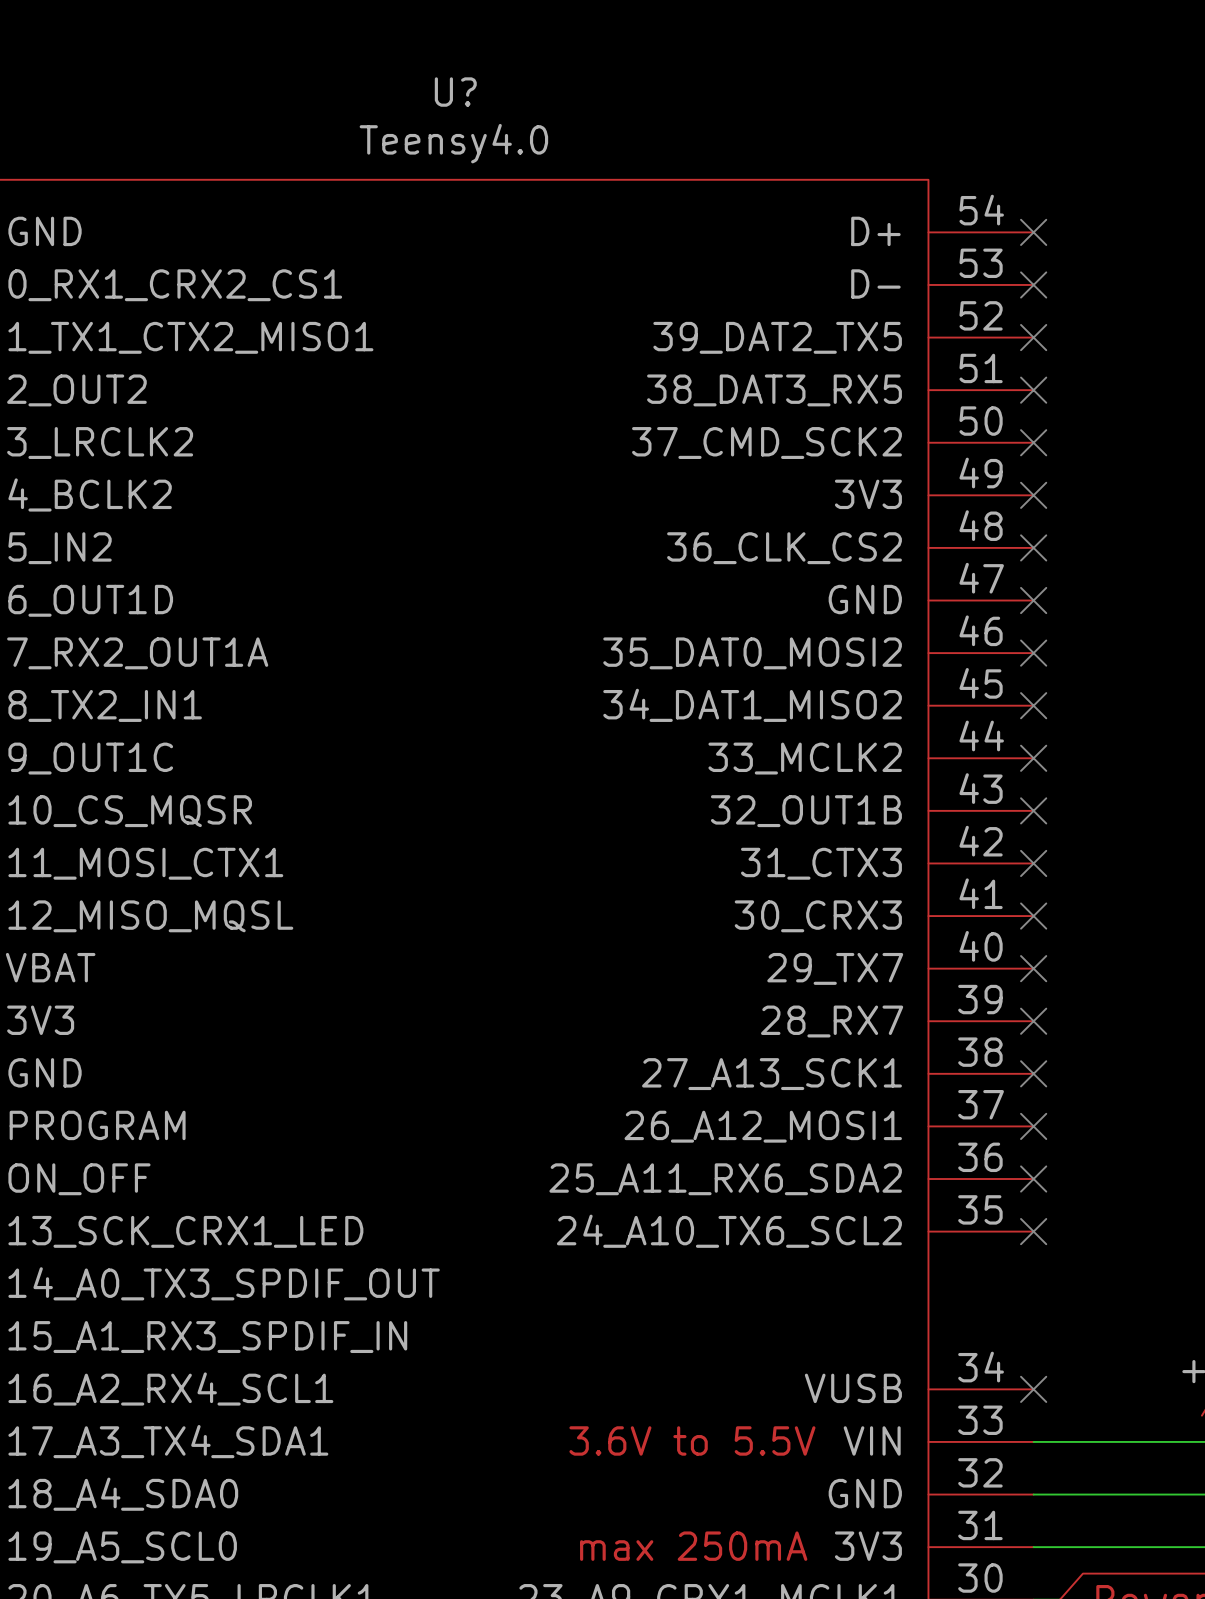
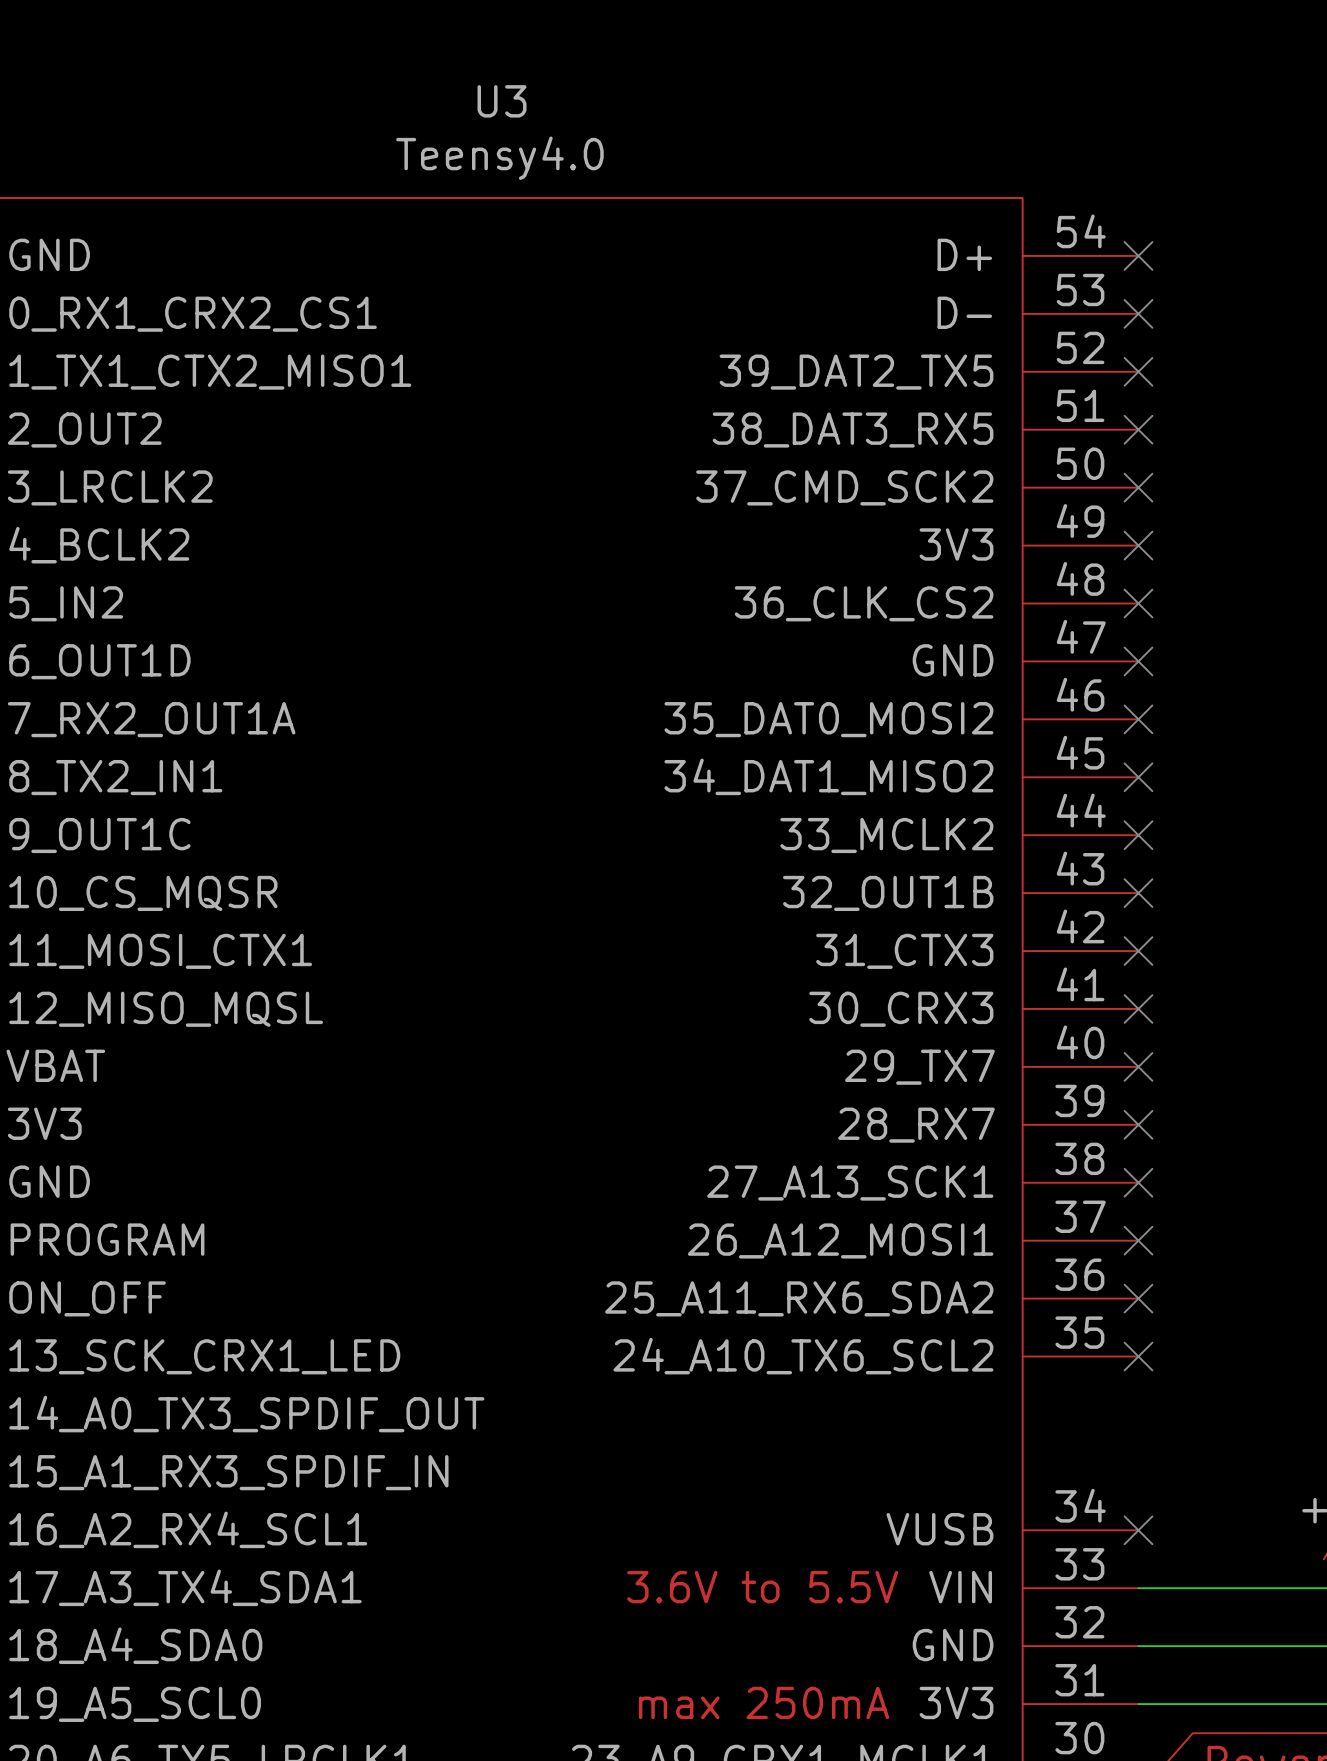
U? name: U? (455, 92) -> U3 (502, 101)

